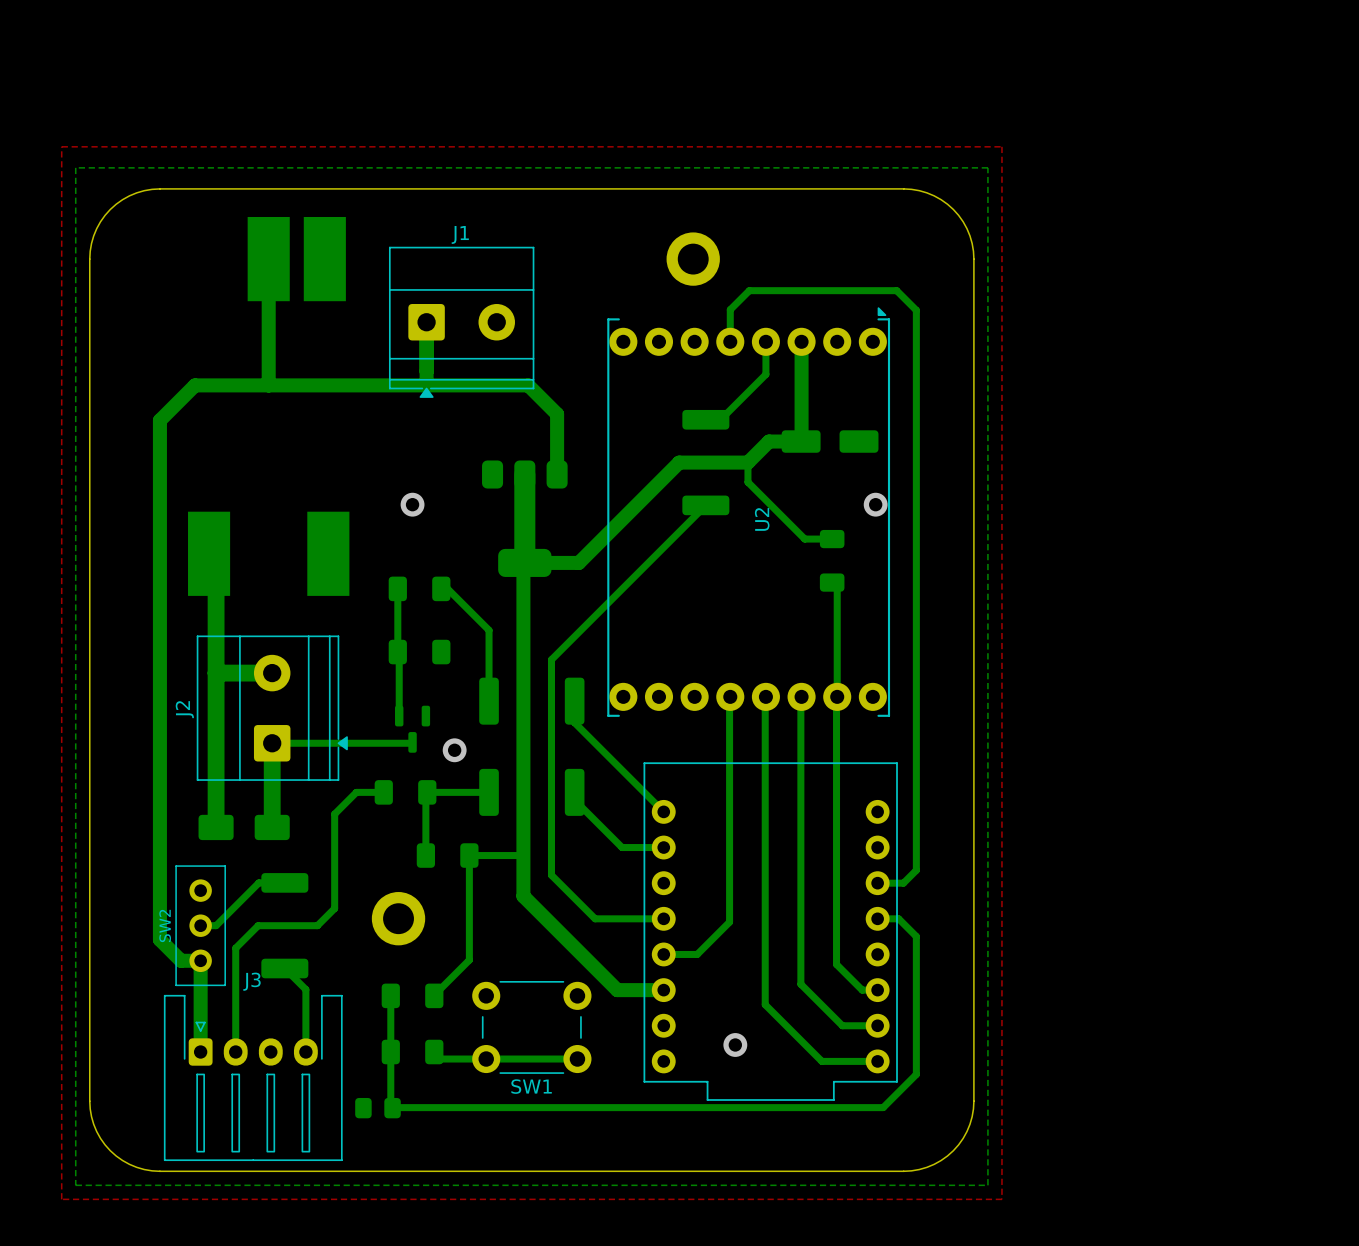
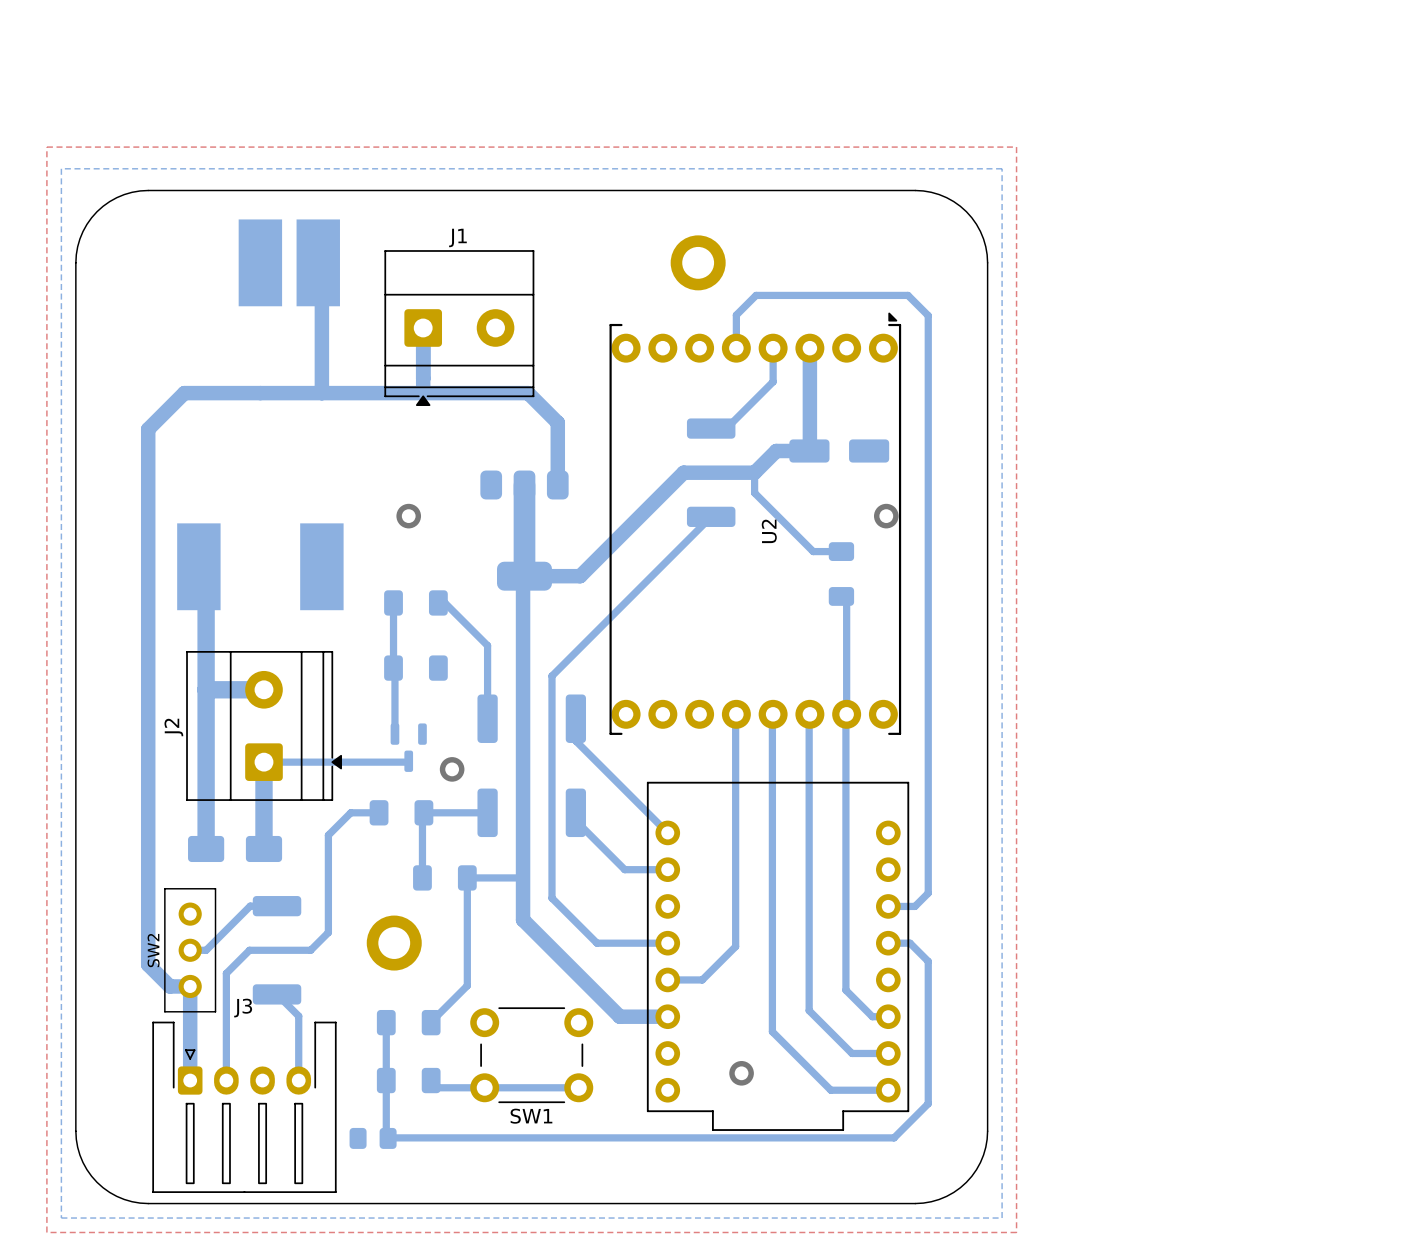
bottom track: (268, 280) (268, 385) -> none
bottom track: none -> (318, 284) (321, 288) (321, 393)

